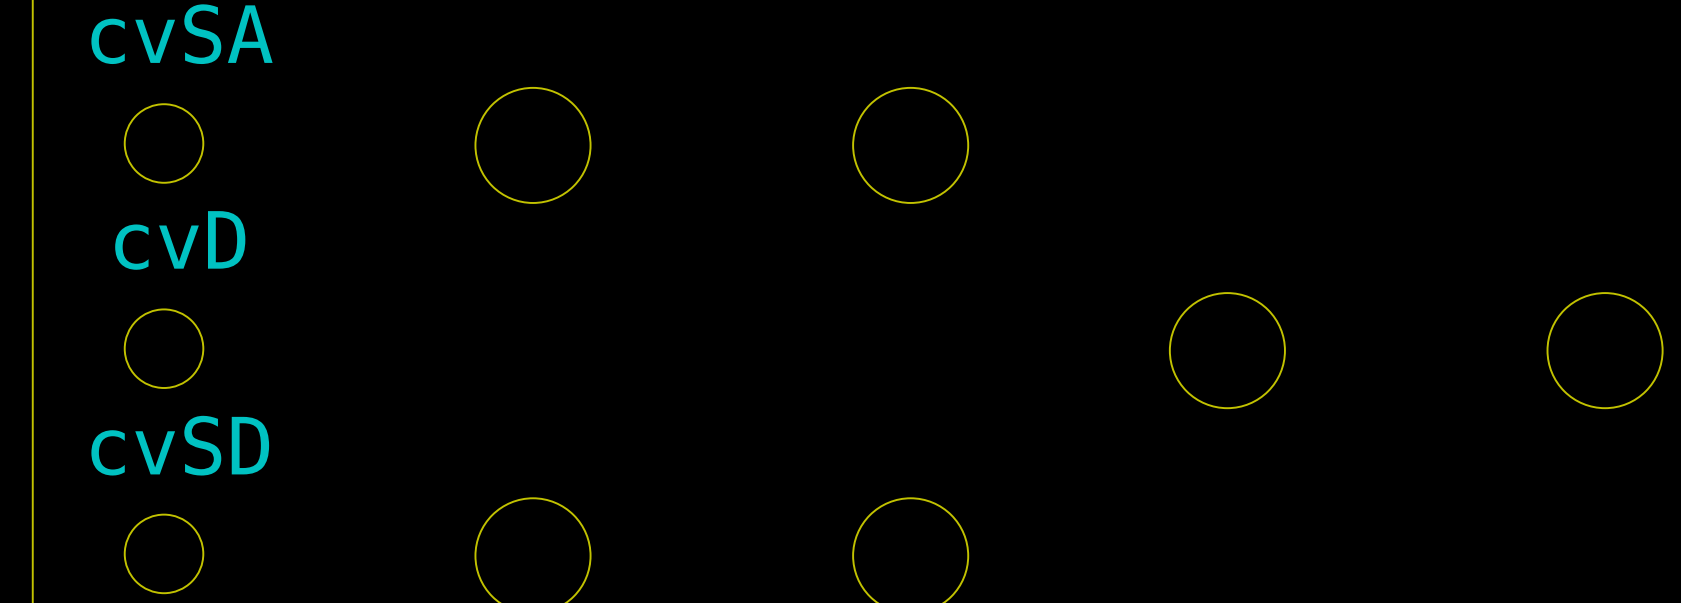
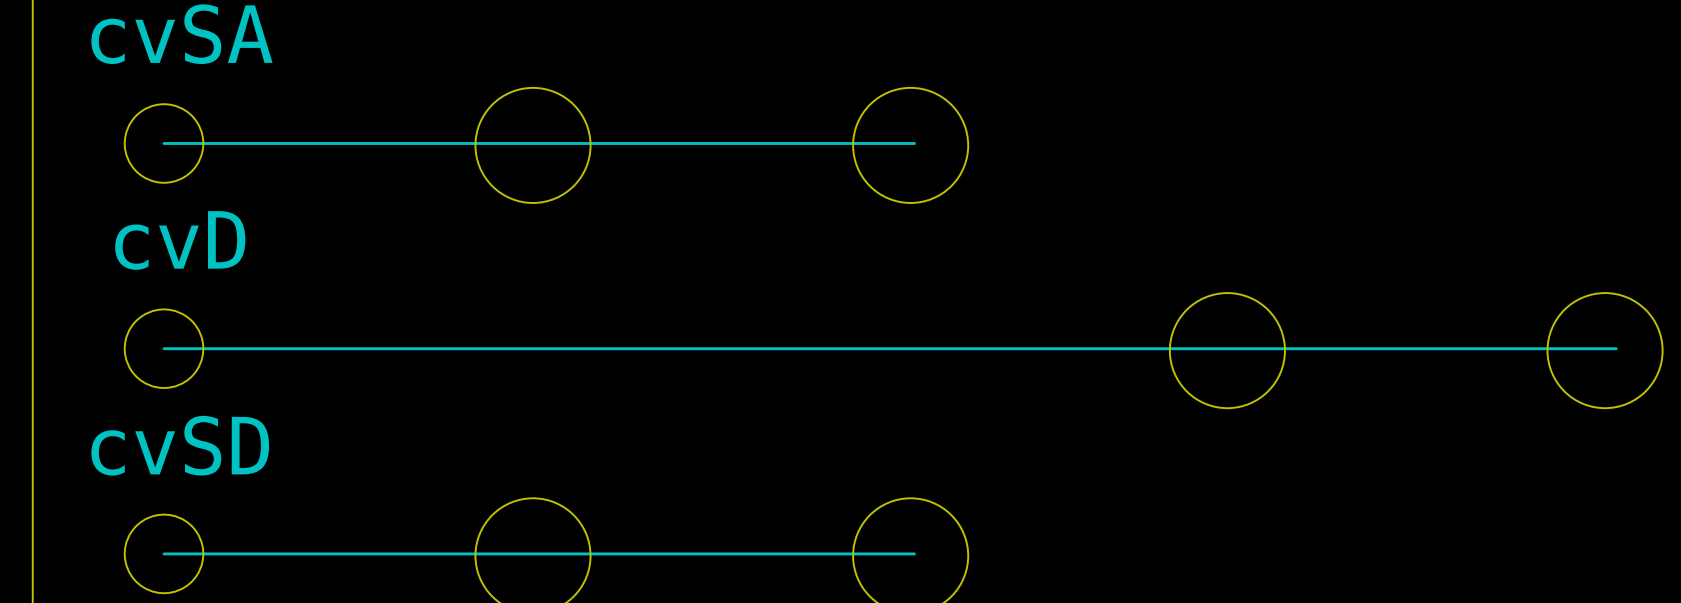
line: none -> (164, 143) (914, 143)
line: none -> (164, 348) (1616, 348)
line: none -> (164, 553) (914, 553)

